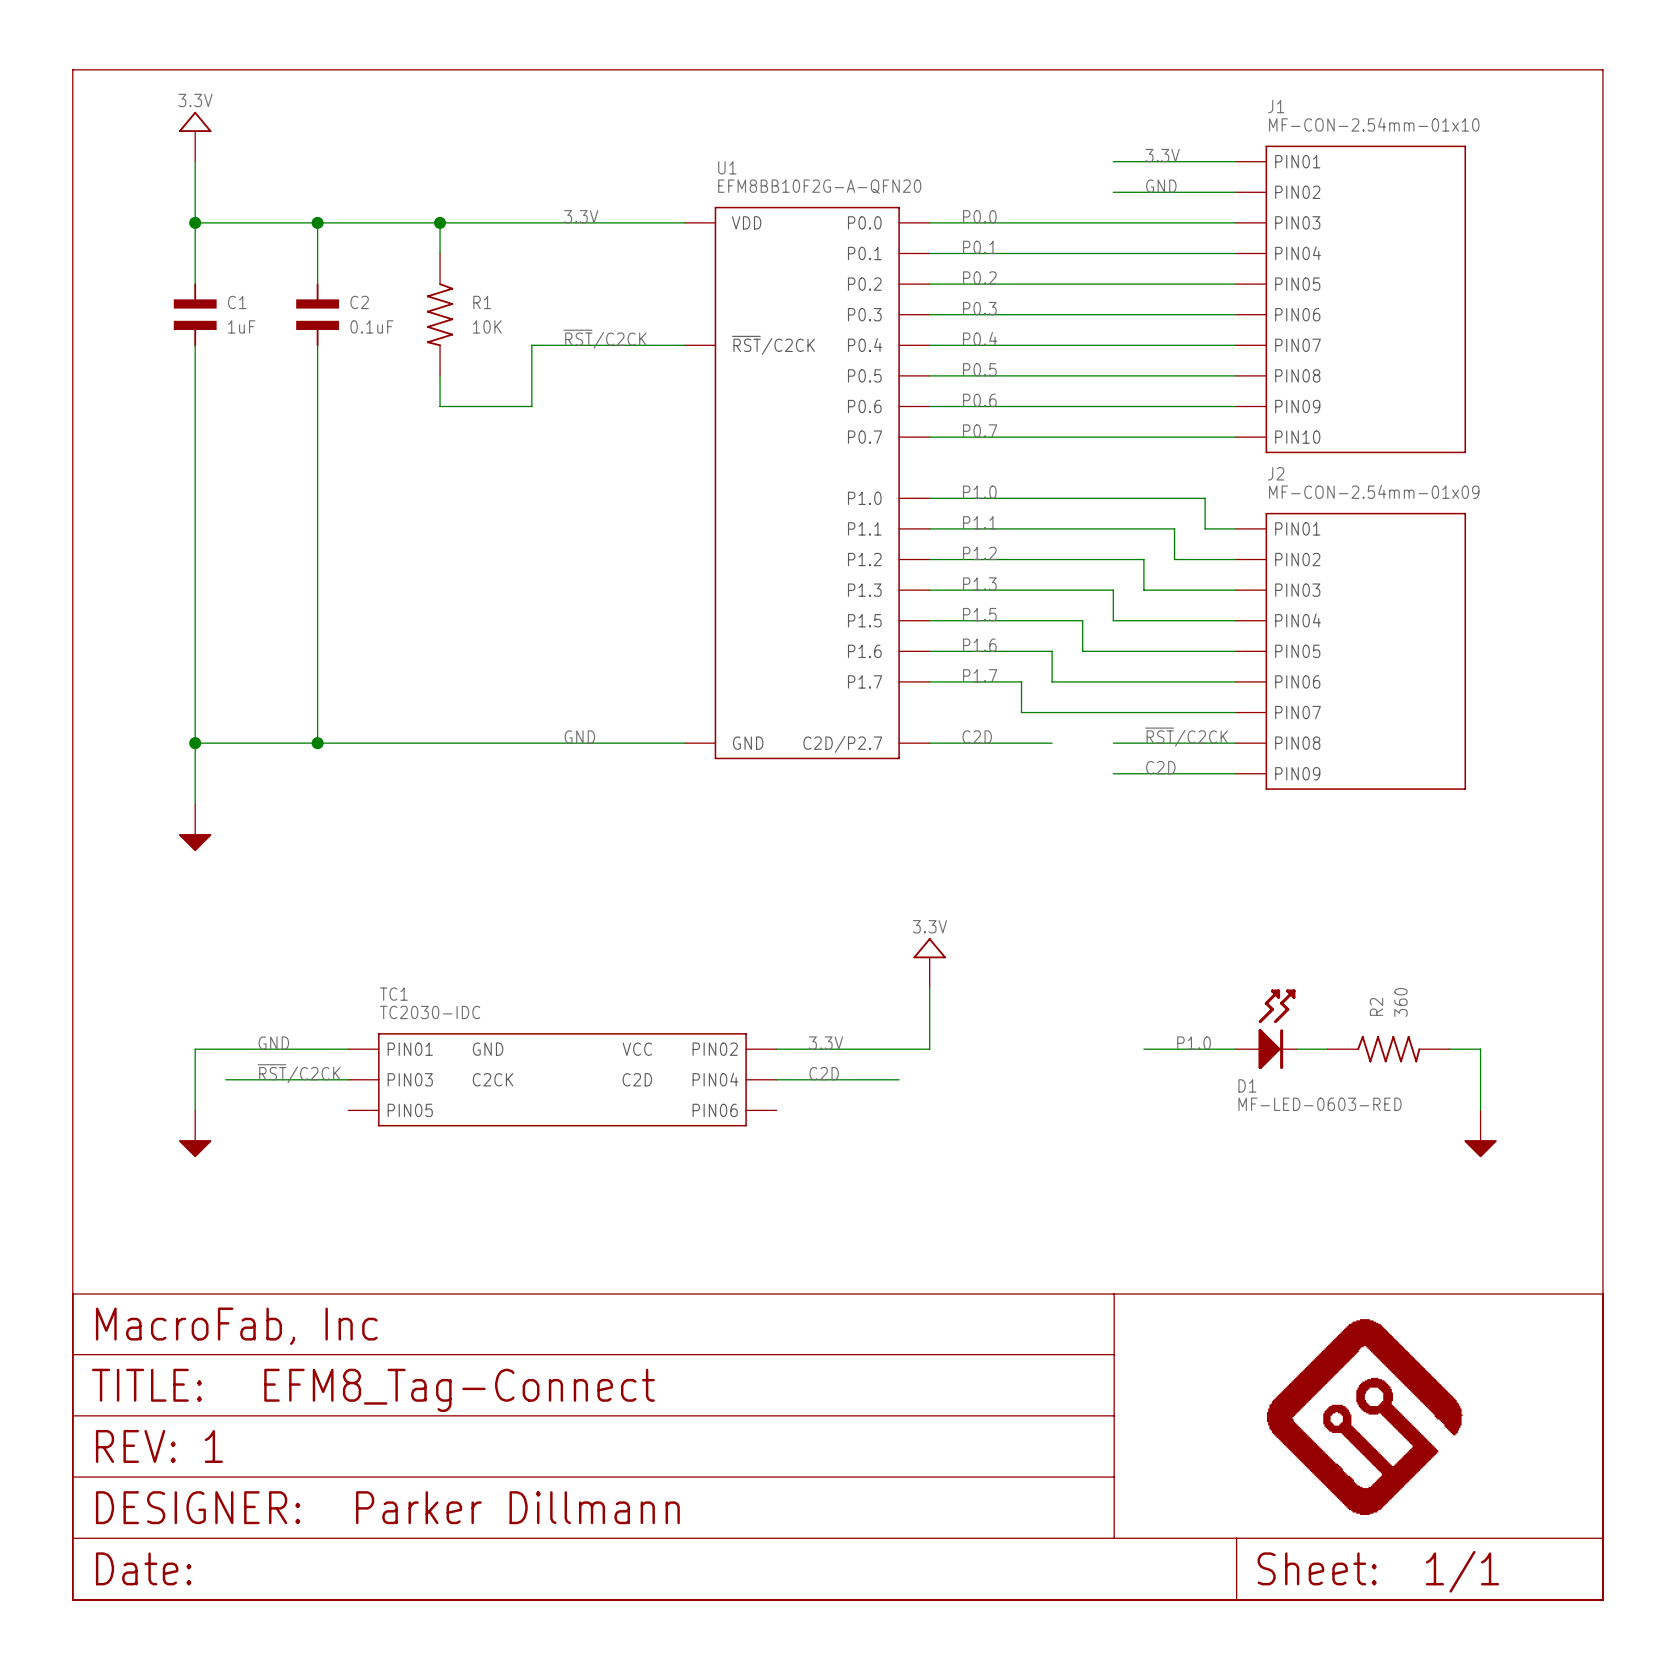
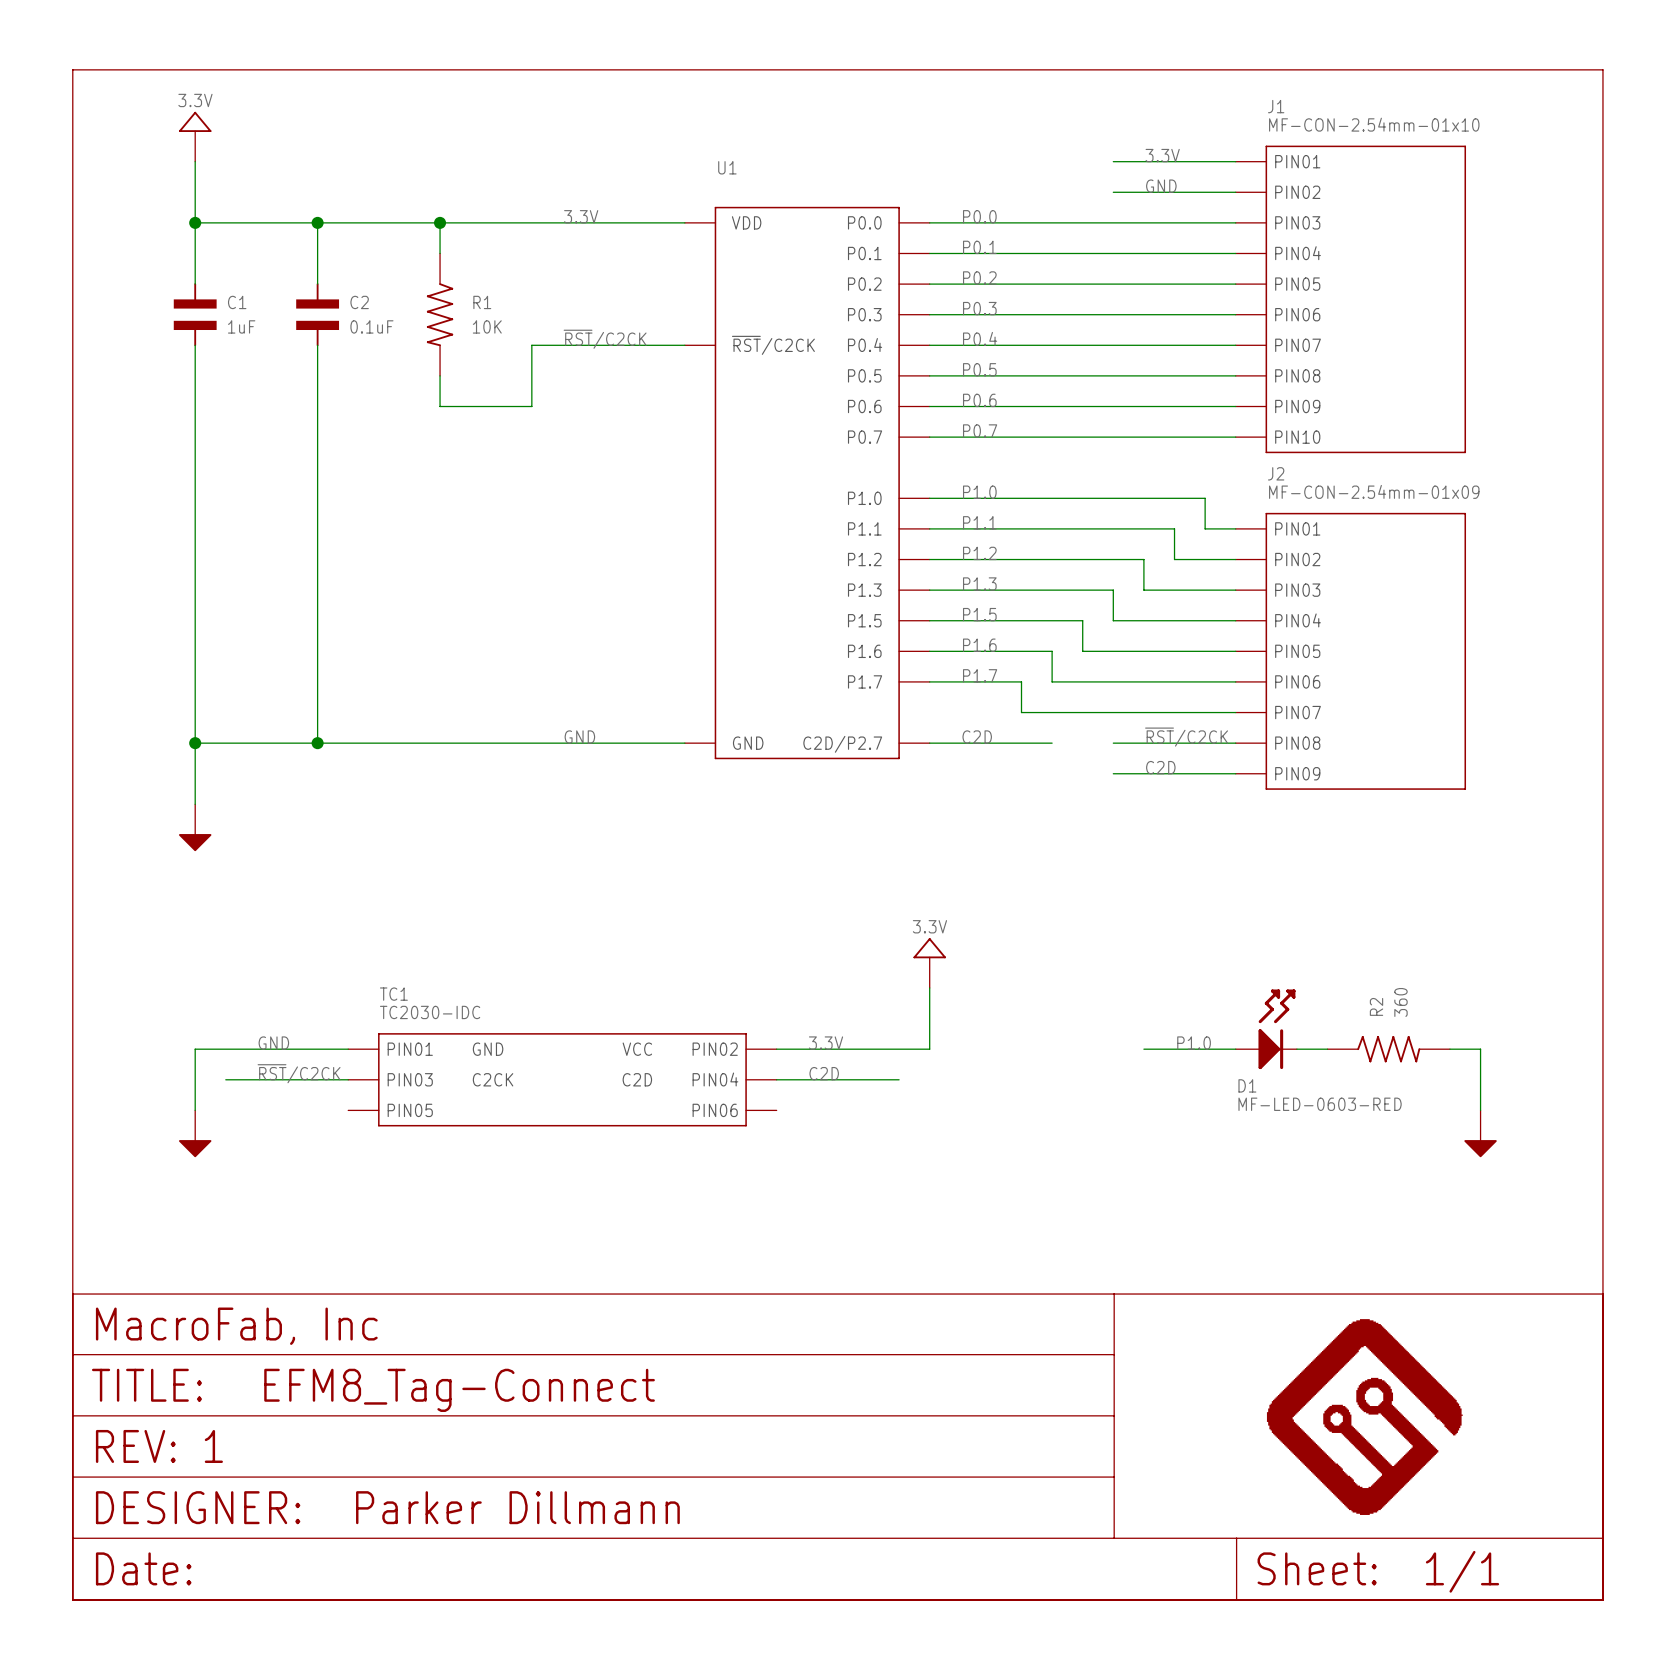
U1 value: EFM8BB10F2G-A-QFN20 (819, 186) -> none

